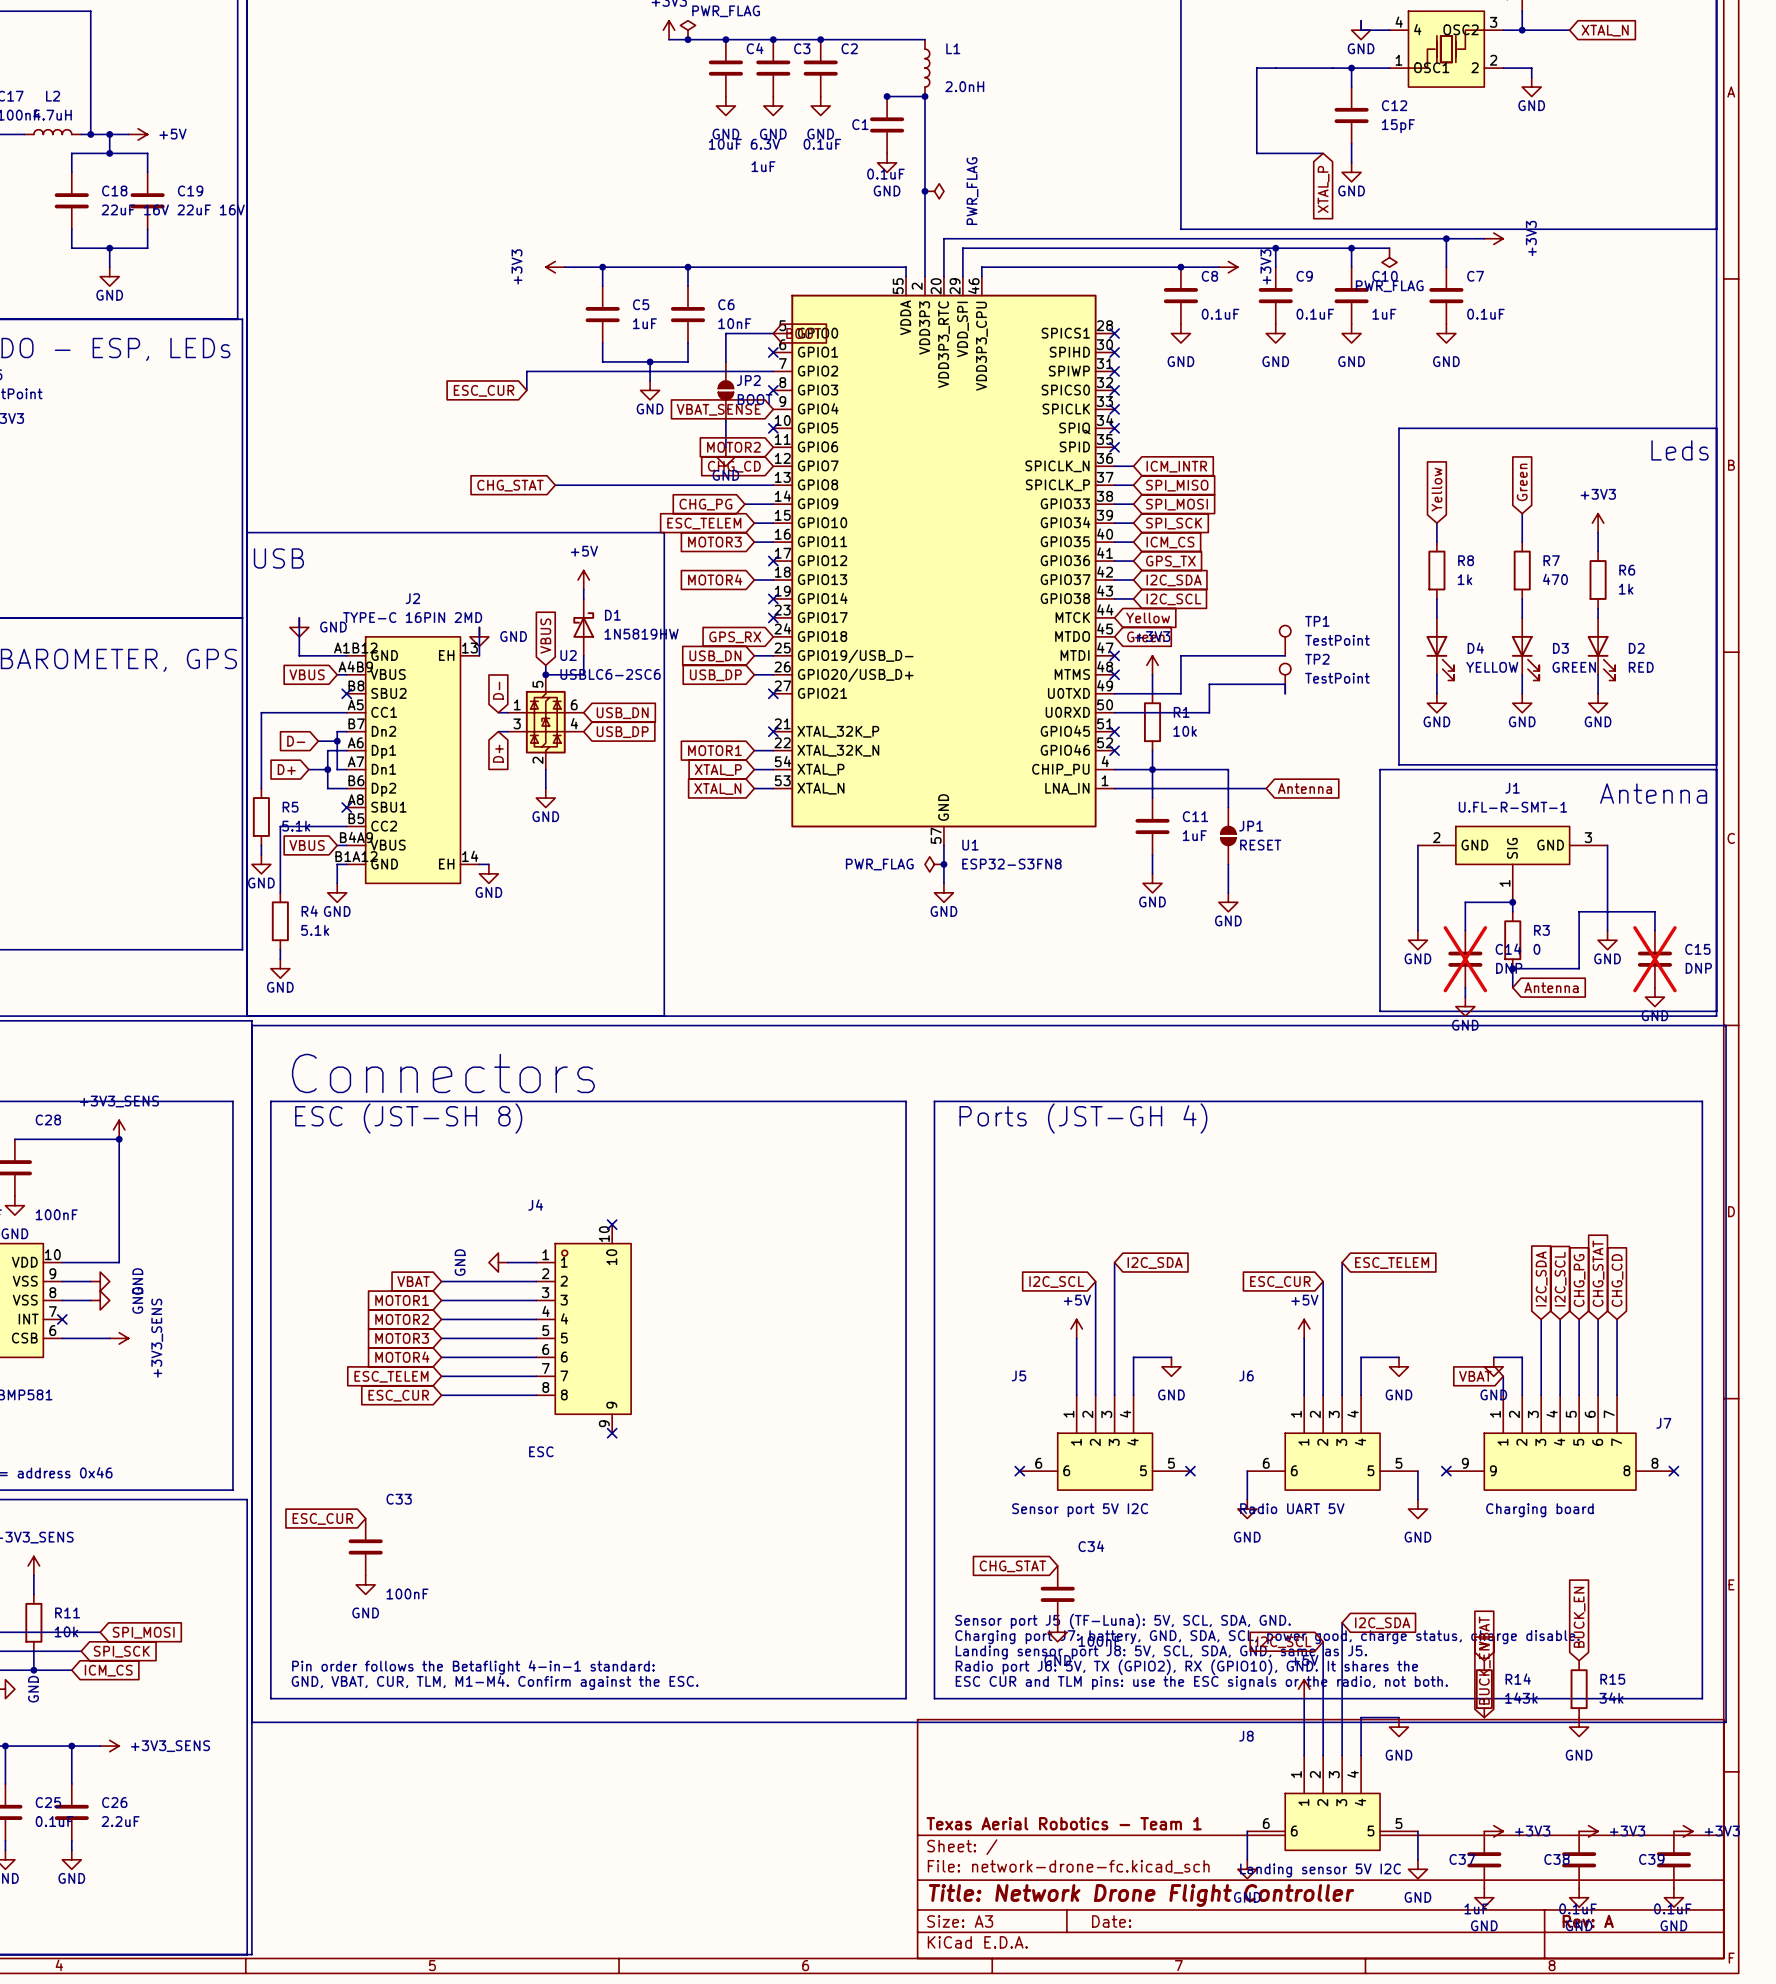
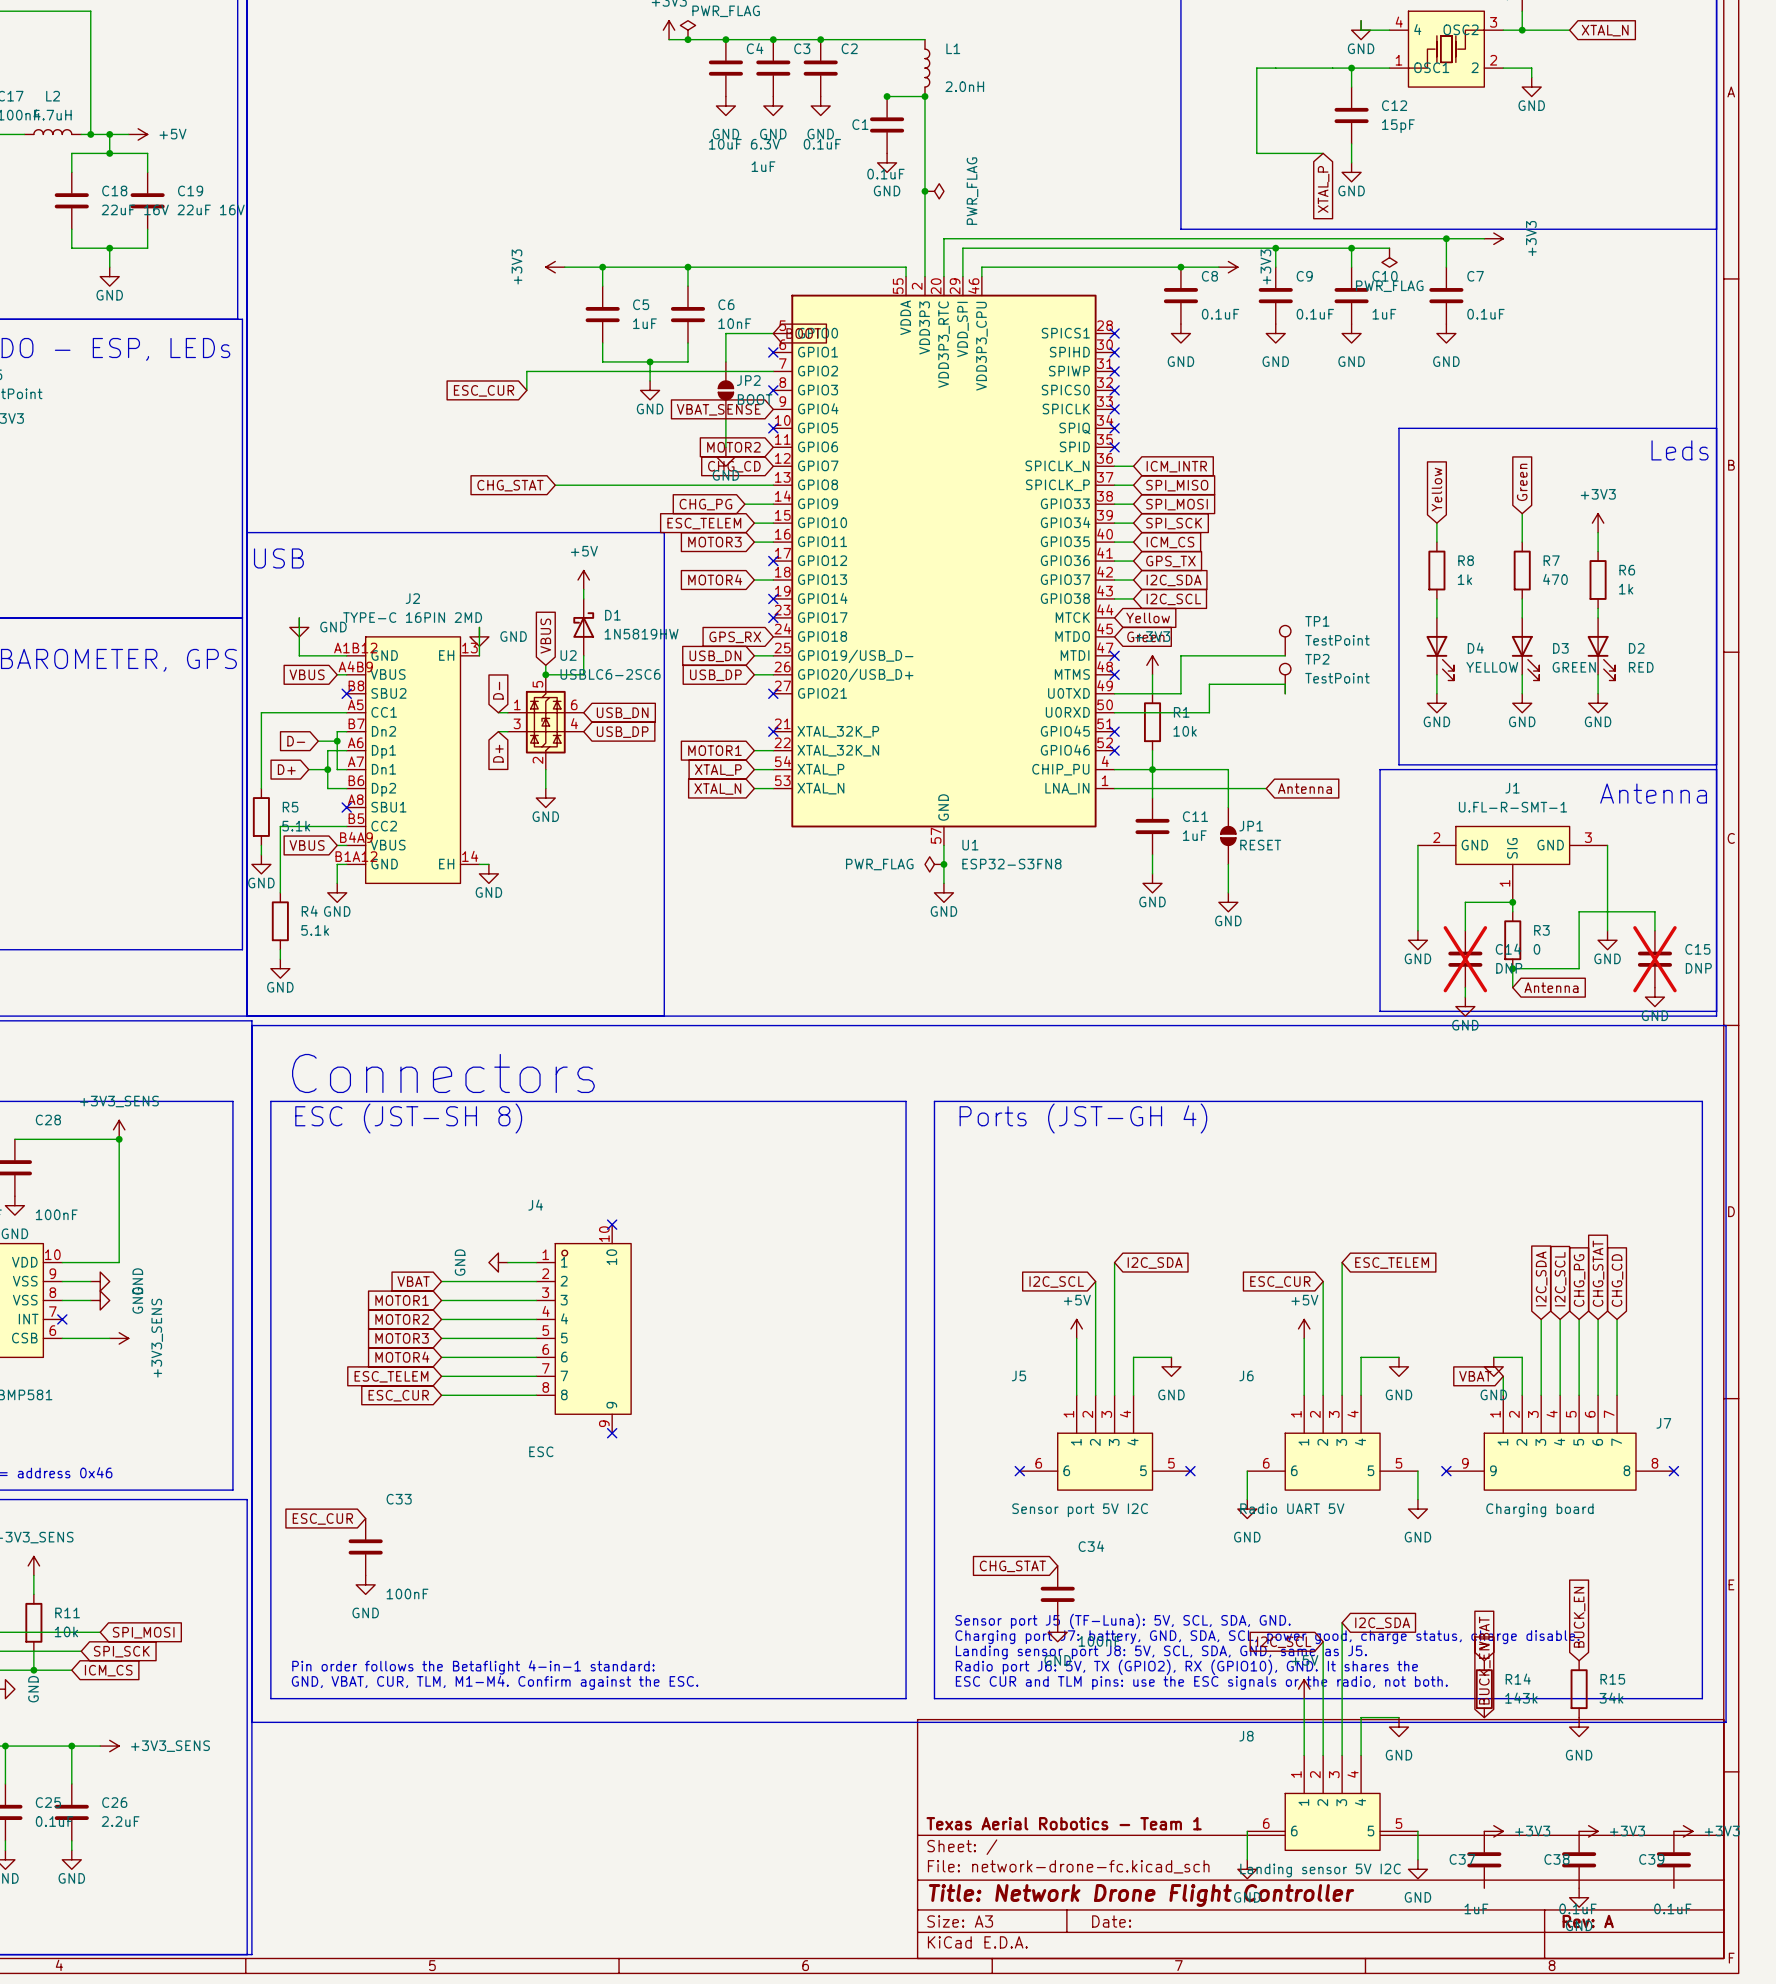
power symbol: GND (1484, 1897) -> none
power symbol: GND (1673, 1897) -> none

